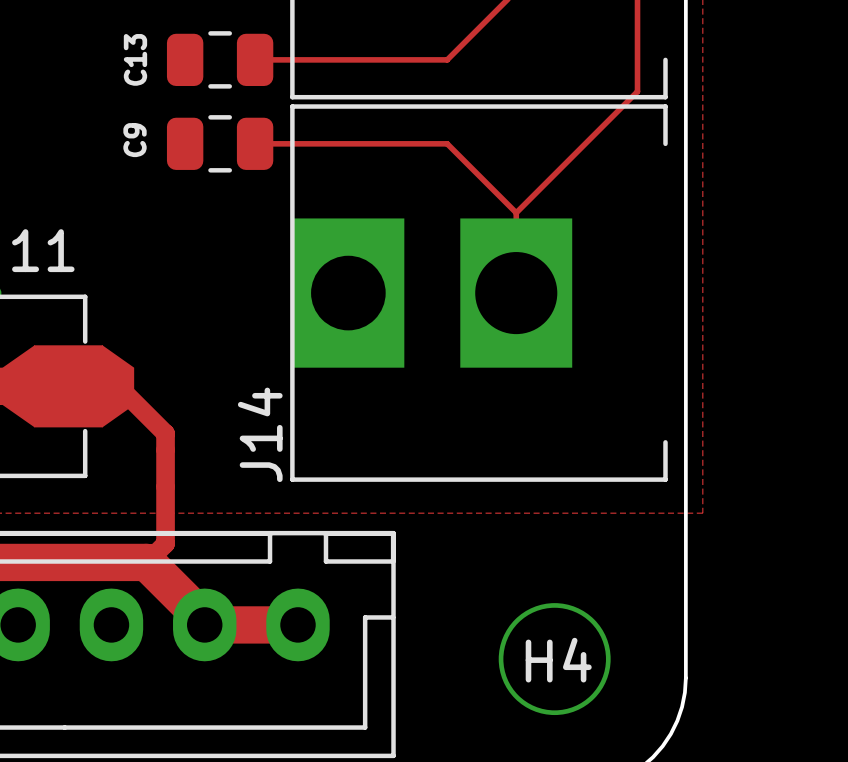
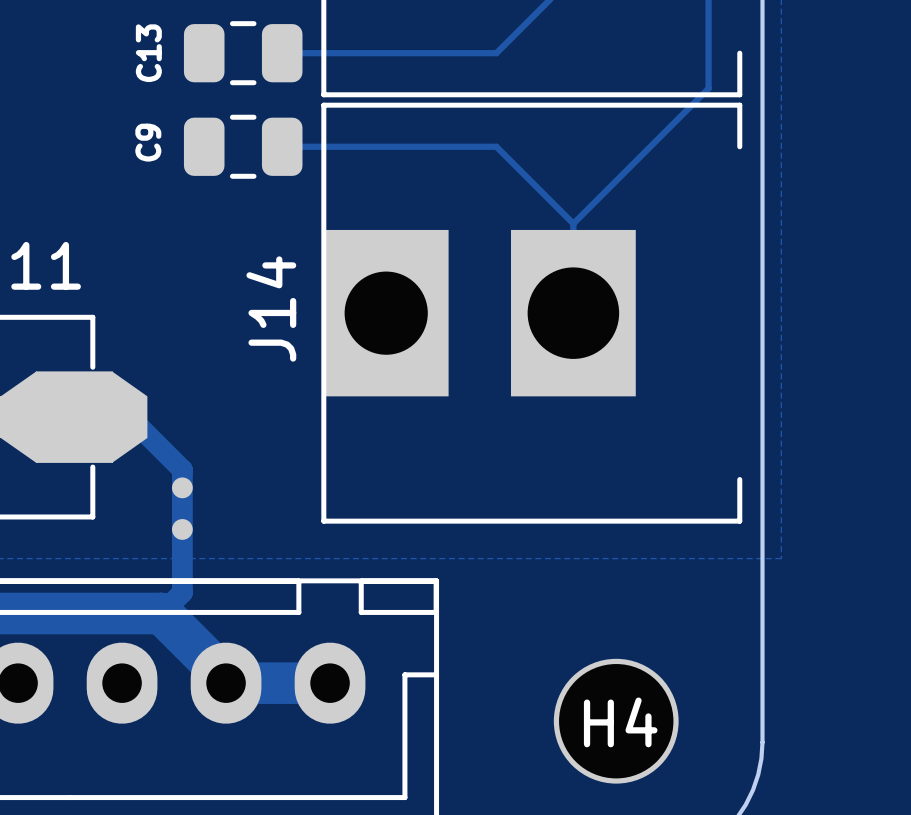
J14 name position: J14 (260, 434) -> J14 (271, 309)

